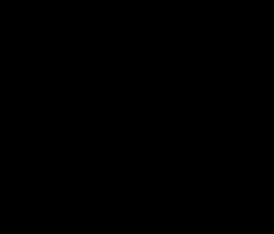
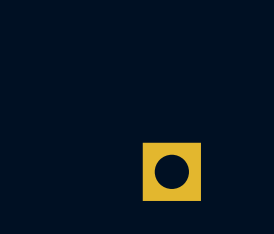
part: none -> (171, 171)

